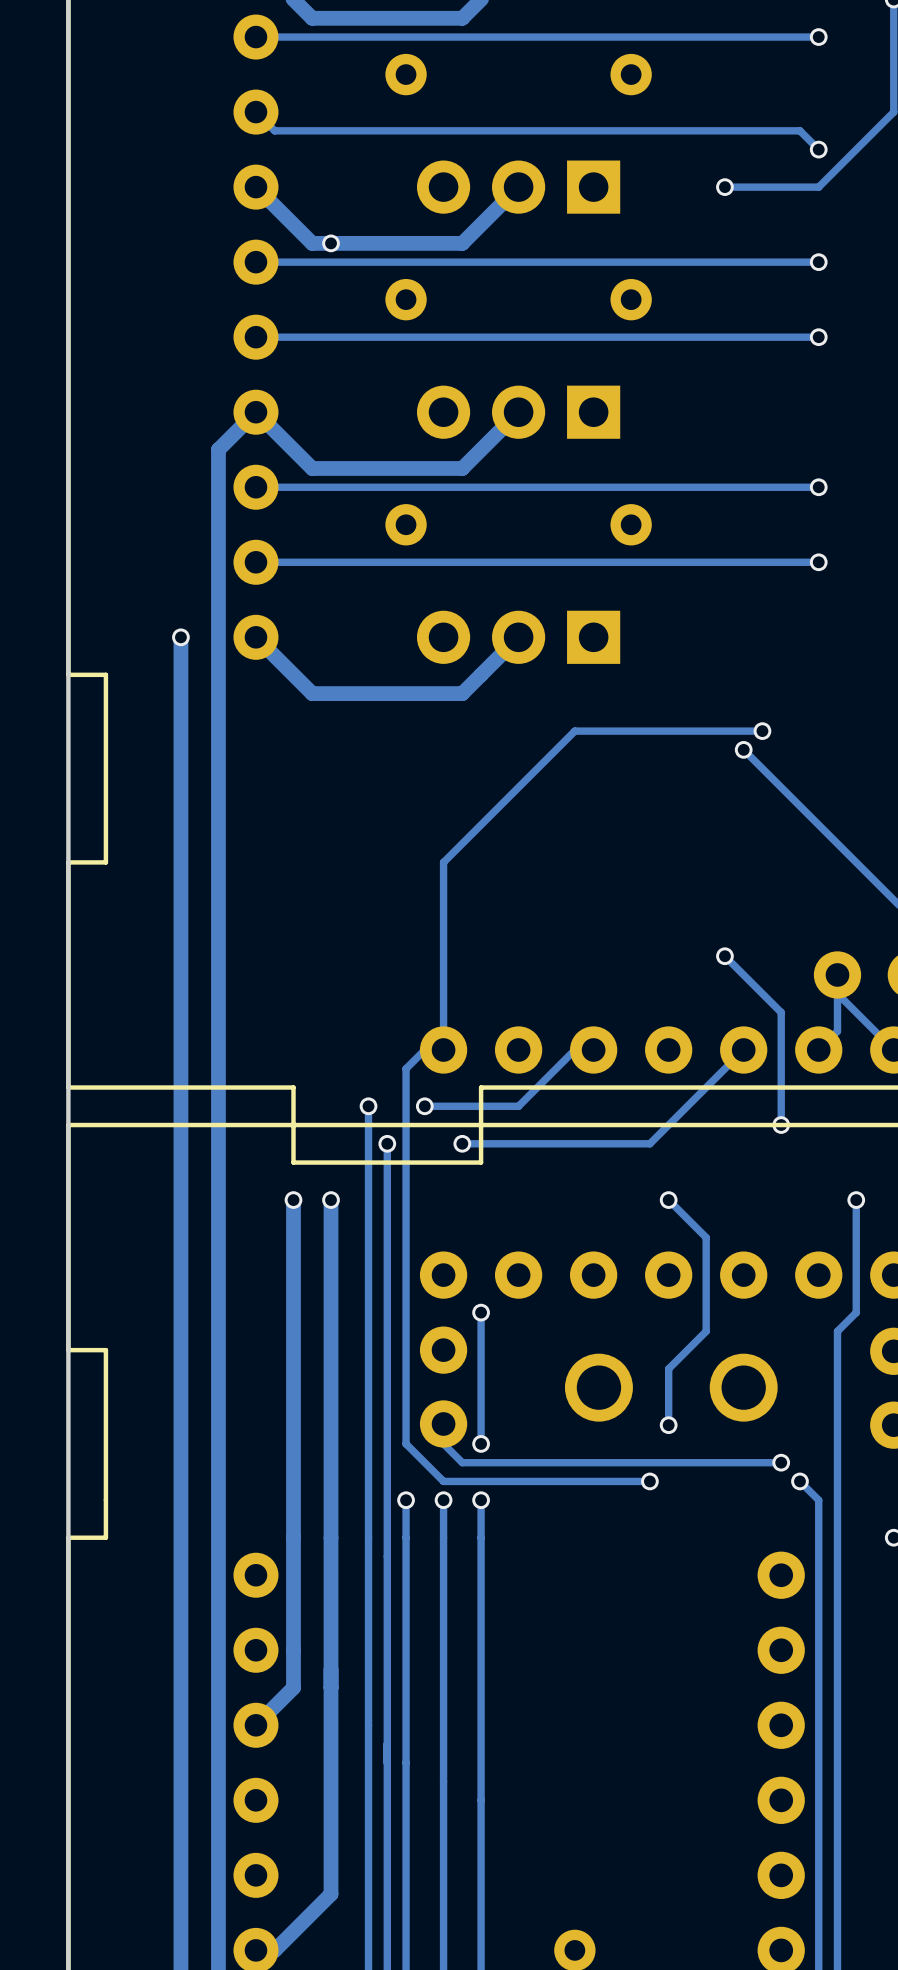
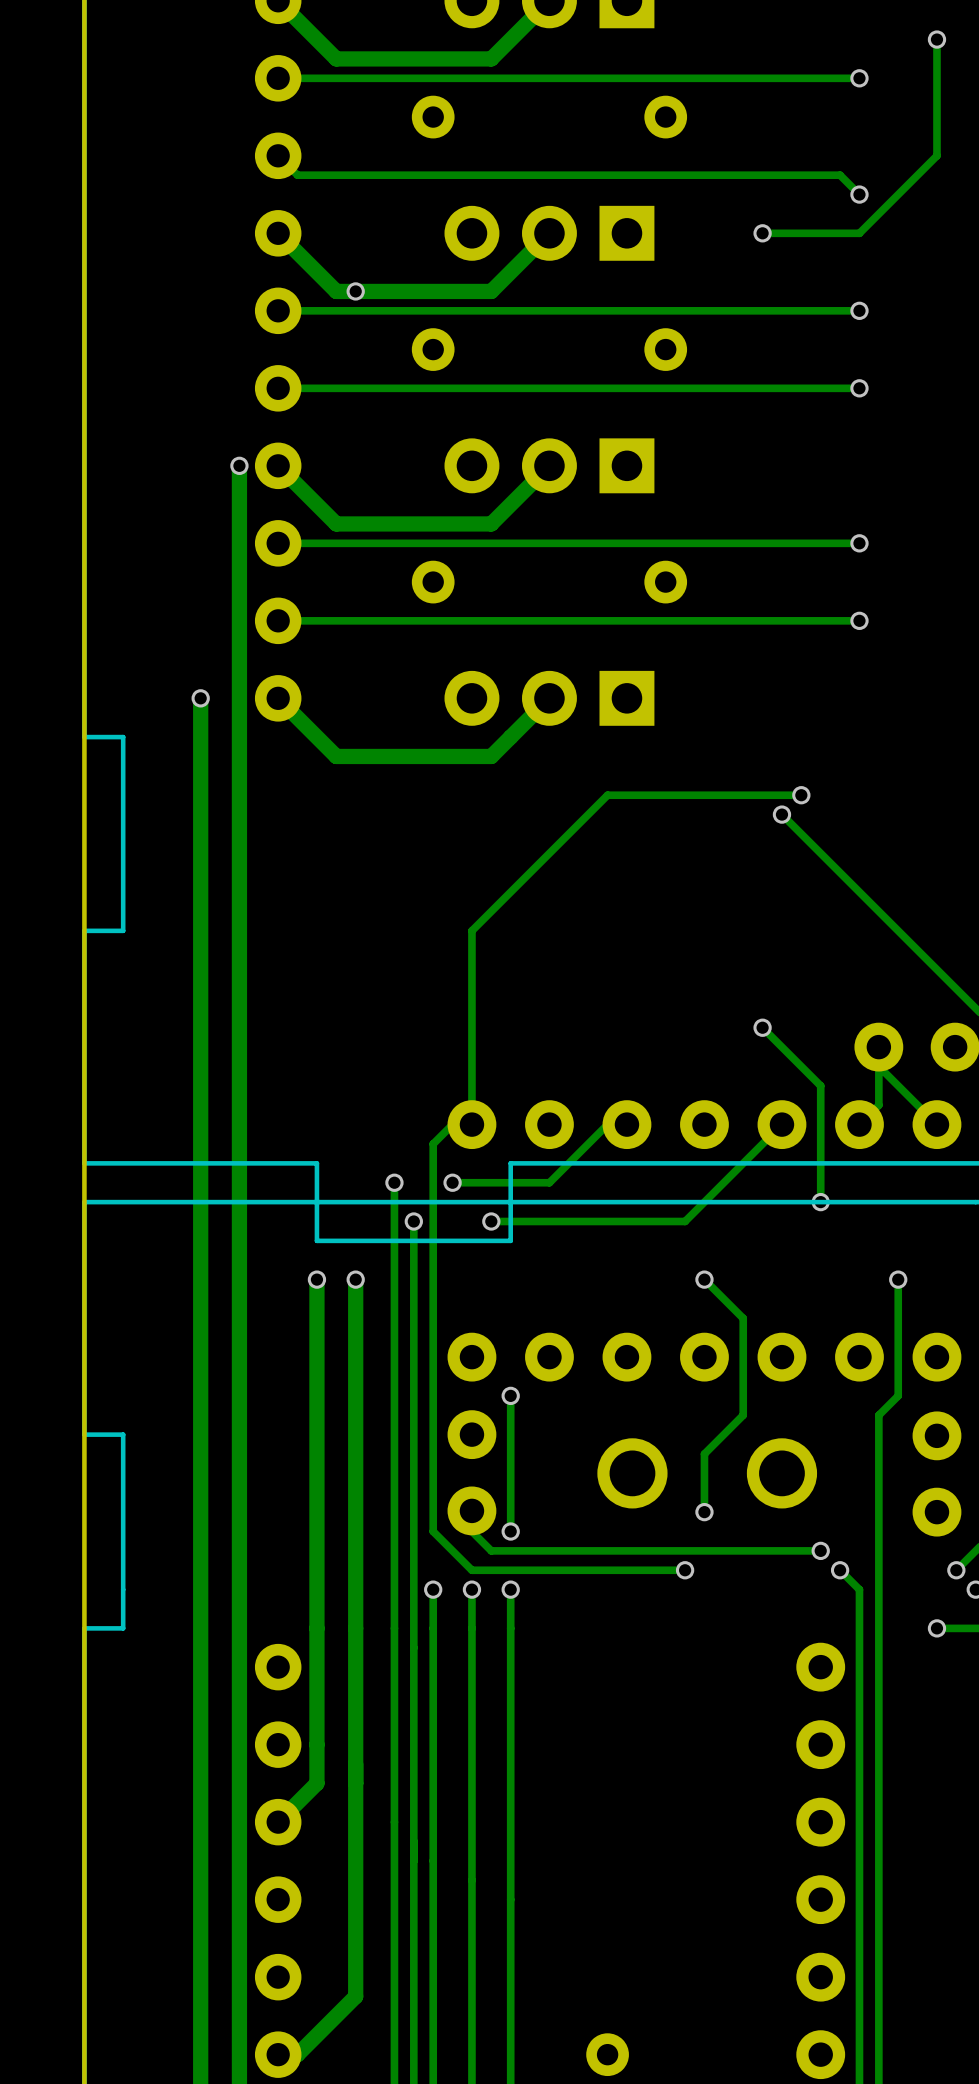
via: none -> (239, 465)
track: (255, 412) (218, 449) -> (239, 465) (239, 504)

